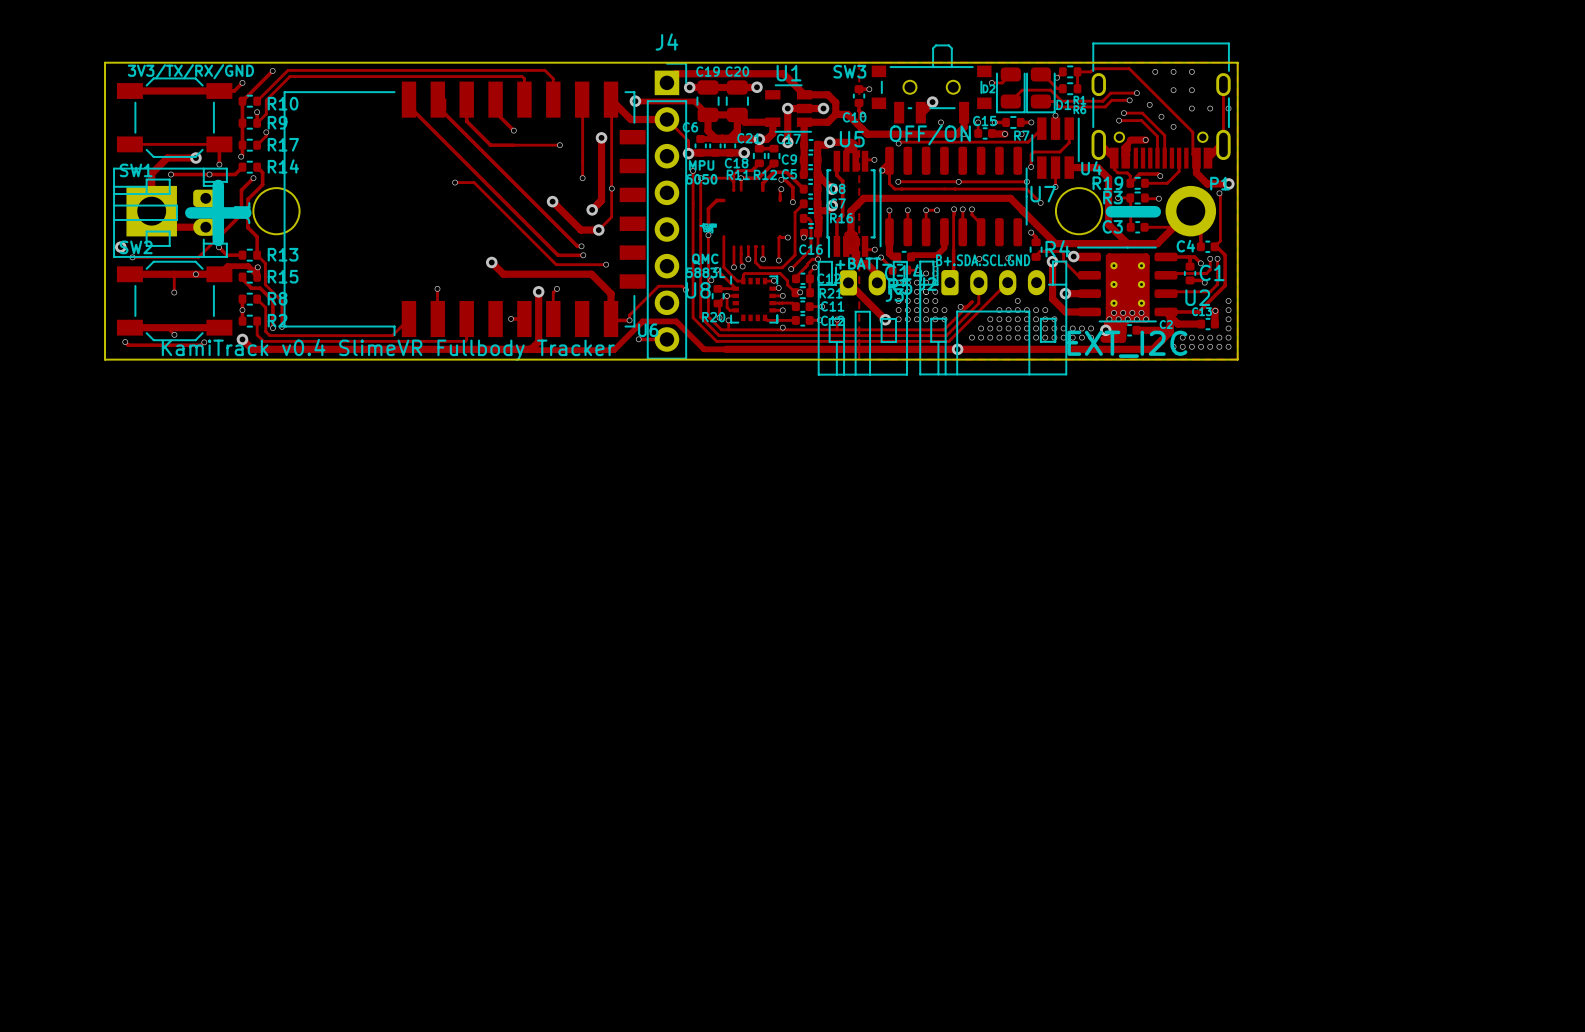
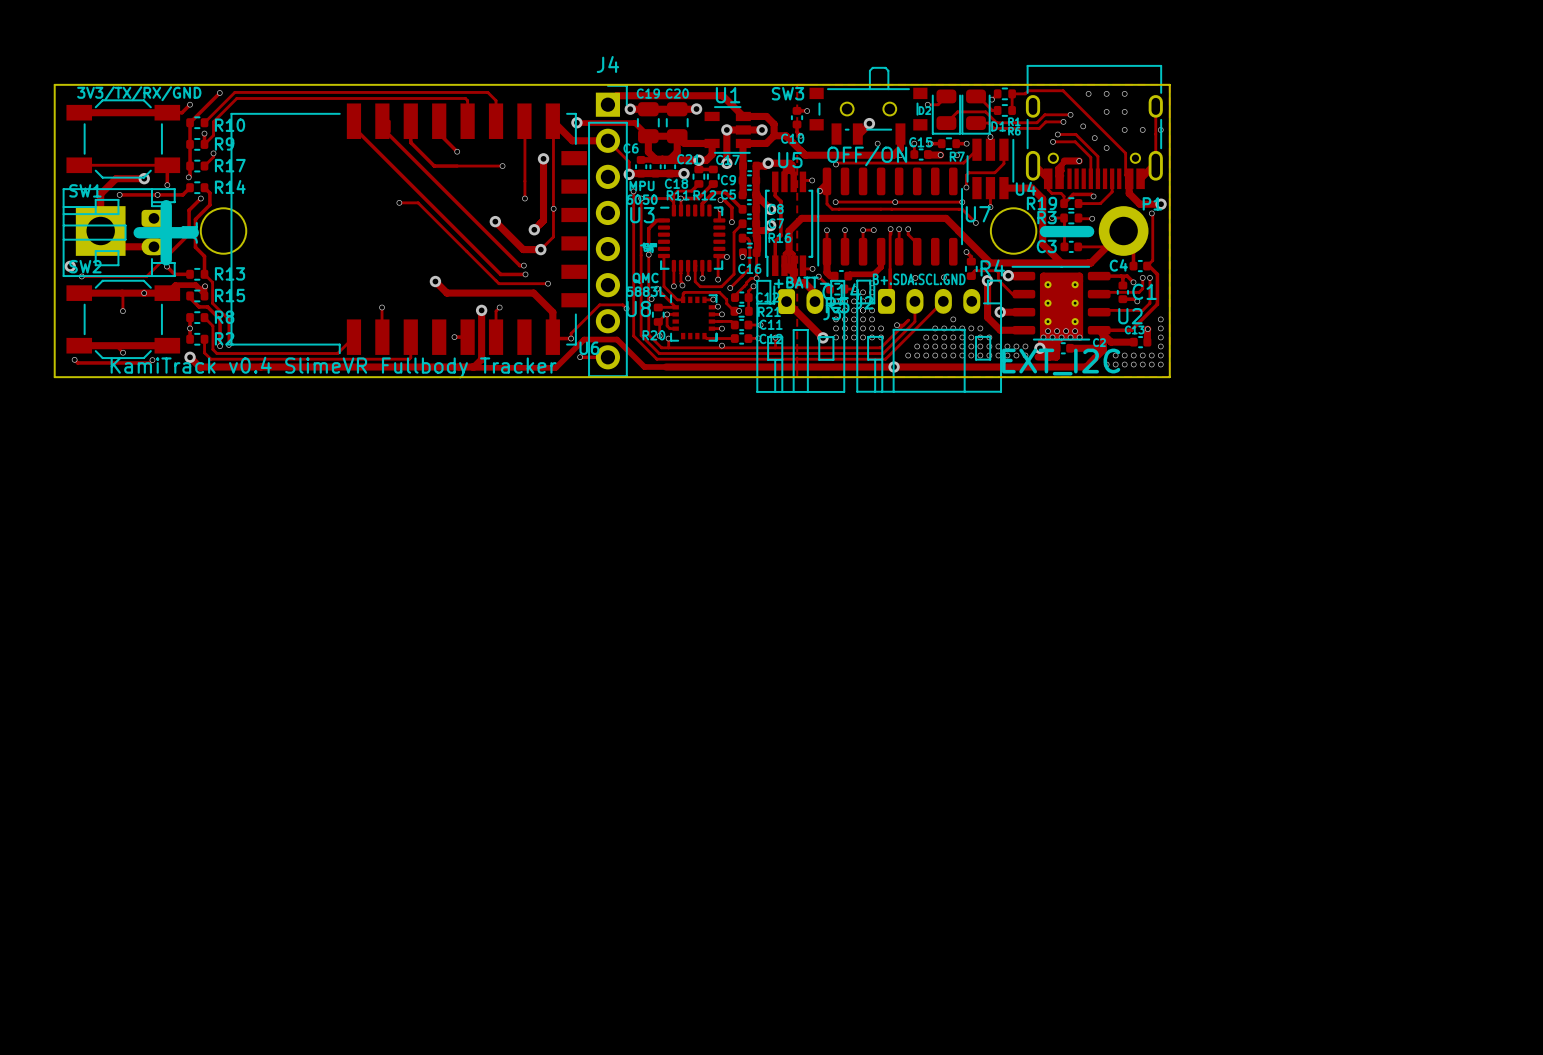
U3: none -> (691, 238)

